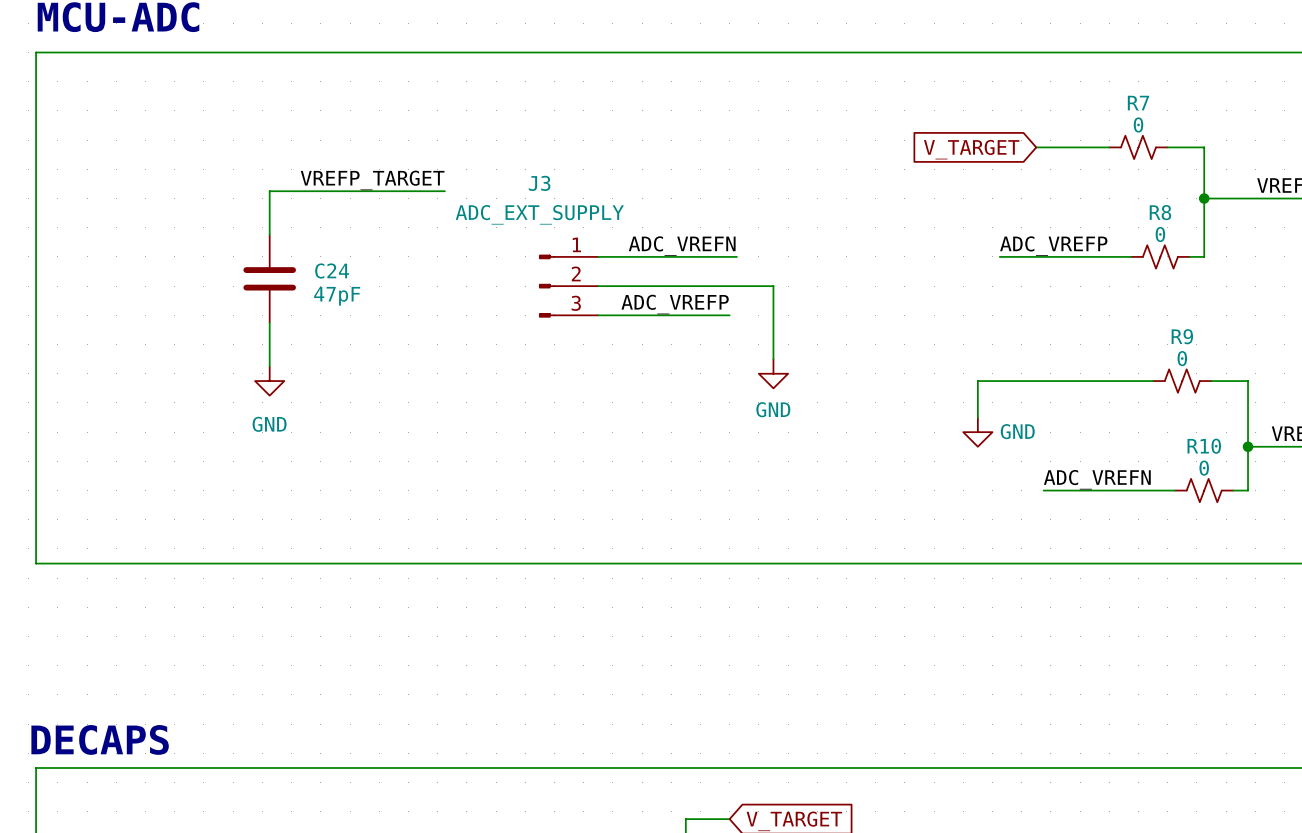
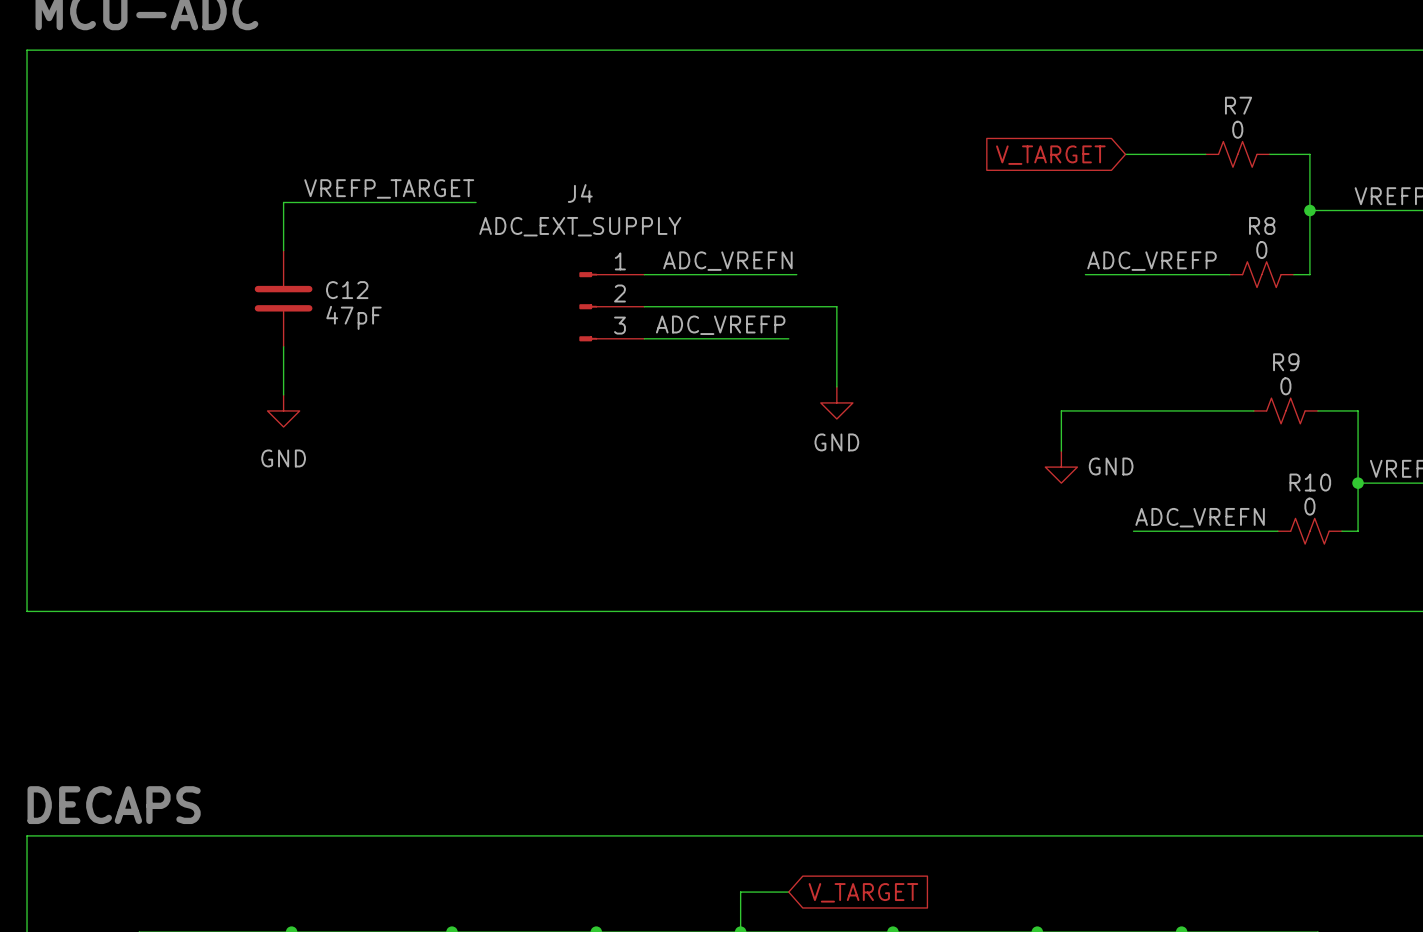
J3 name: J3 (539, 183) -> J4 (580, 193)
C24 name: C24 (332, 271) -> C12 (347, 290)

